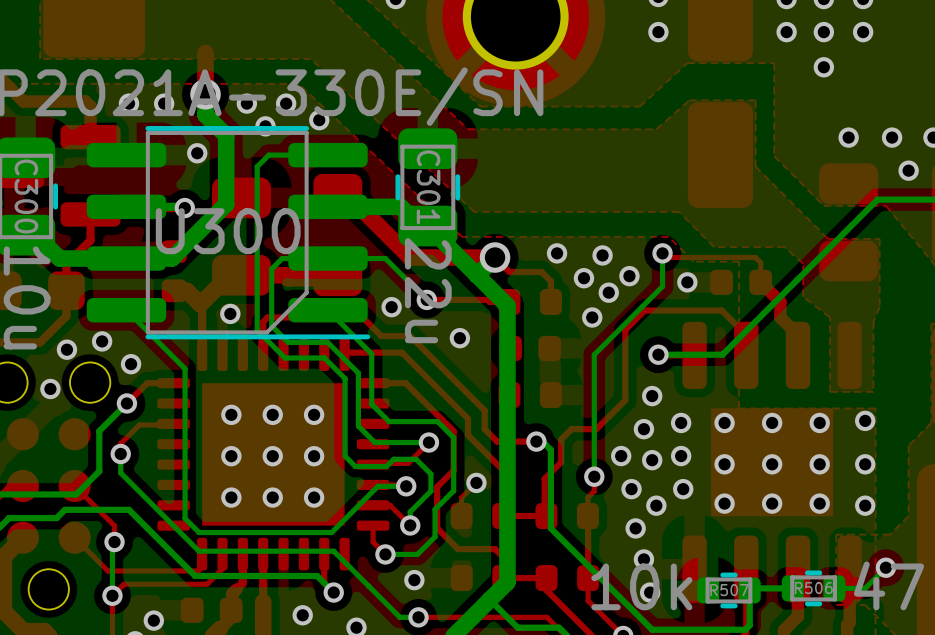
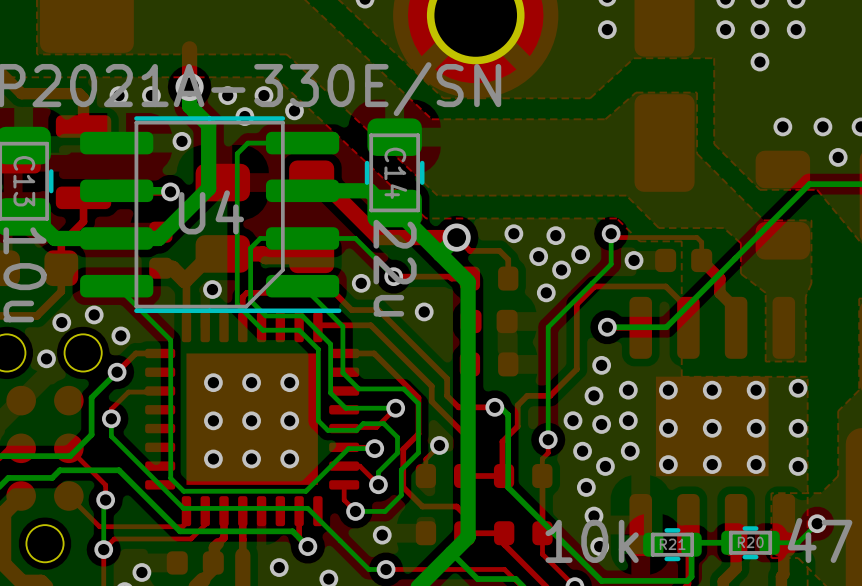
C301 name: C301 (428, 187) -> C14 (395, 173)
C300 name: C300 (26, 196) -> C13 (24, 181)
U300 name: U300 (228, 231) -> U4 (211, 212)
R506 name: R506 (813, 588) -> R20 (750, 542)
R507 name: R507 (729, 590) -> R21 (672, 544)

